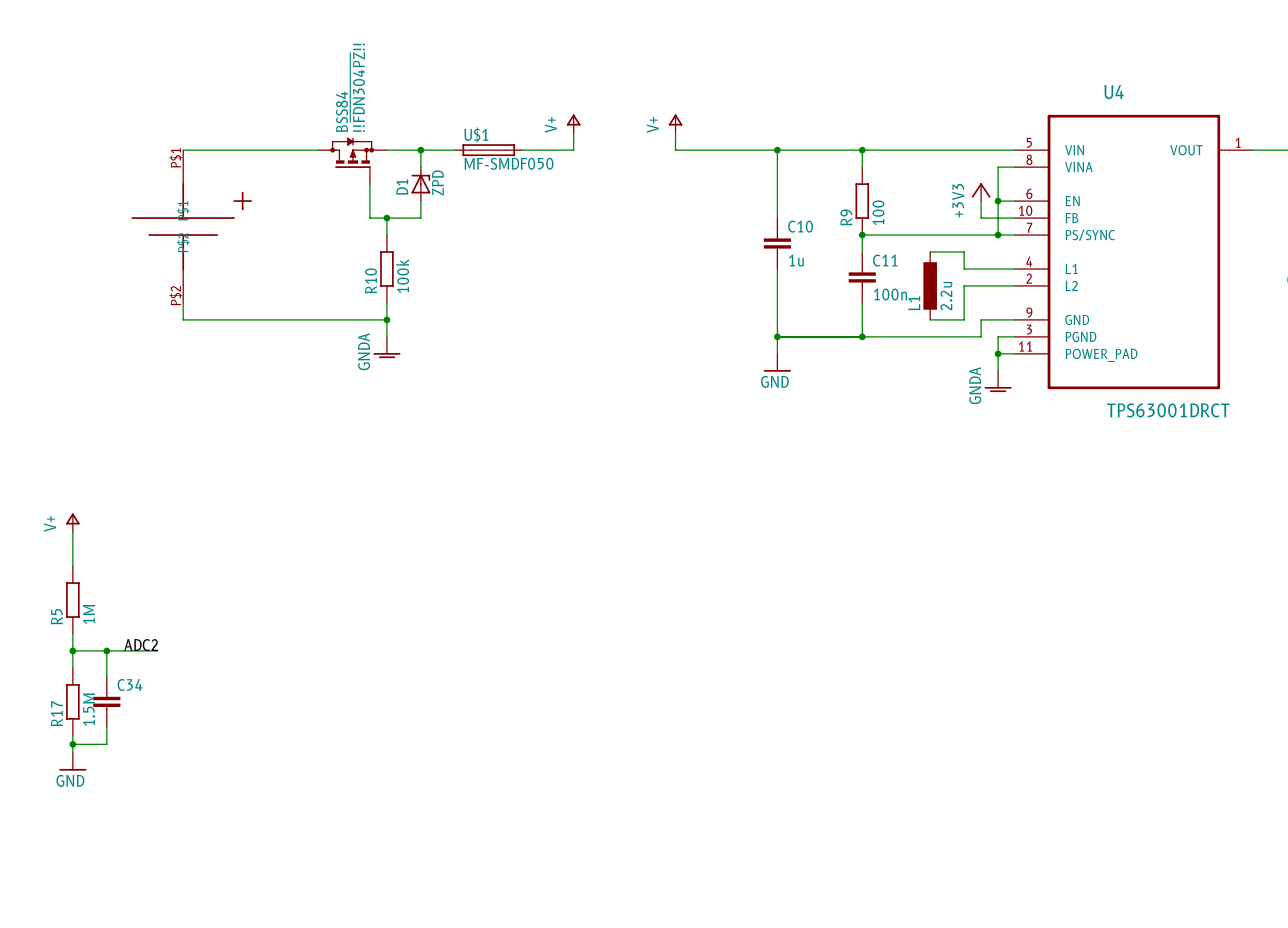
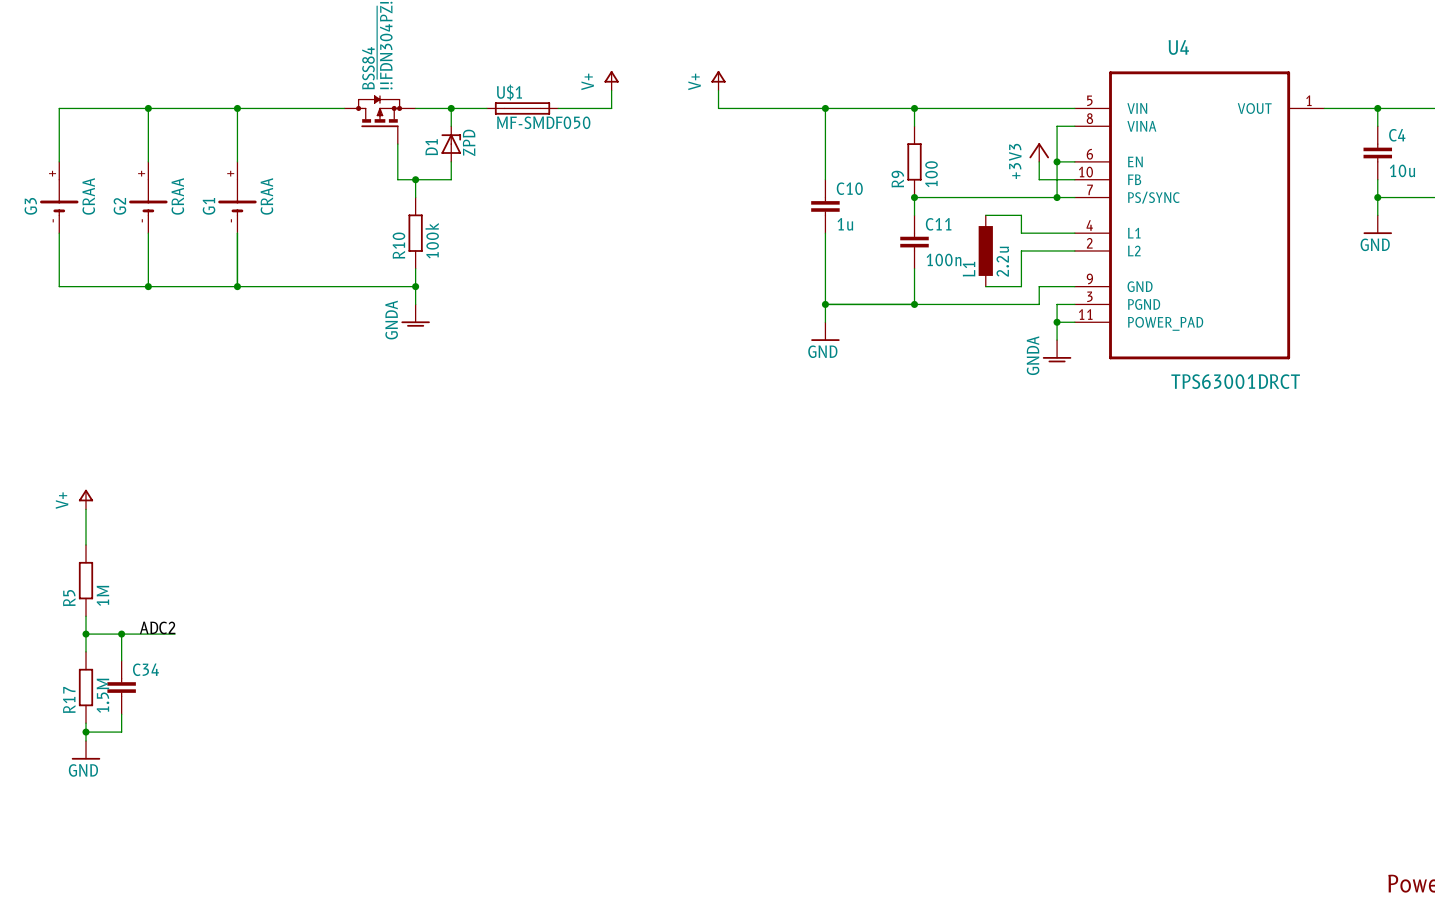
wire: none -> (148, 108) (148, 161)
junction: none -> (148, 108)
wire: none -> (201, 108) (59, 108) (59, 161)
wire: none -> (237, 108) (237, 161)
junction: none -> (237, 108)
part: (191, 226) -> none
G3: none -> CRAA (59, 197)
G2: none -> CRAA (148, 197)
G1: none -> CRAA (237, 197)
wire: none -> (148, 233) (148, 286)
wire: none -> (237, 233) (237, 286)
wire: (183, 302) (183, 319) -> (59, 233) (59, 286) (201, 286)
junction: none -> (148, 286)
junction: none -> (237, 286)

